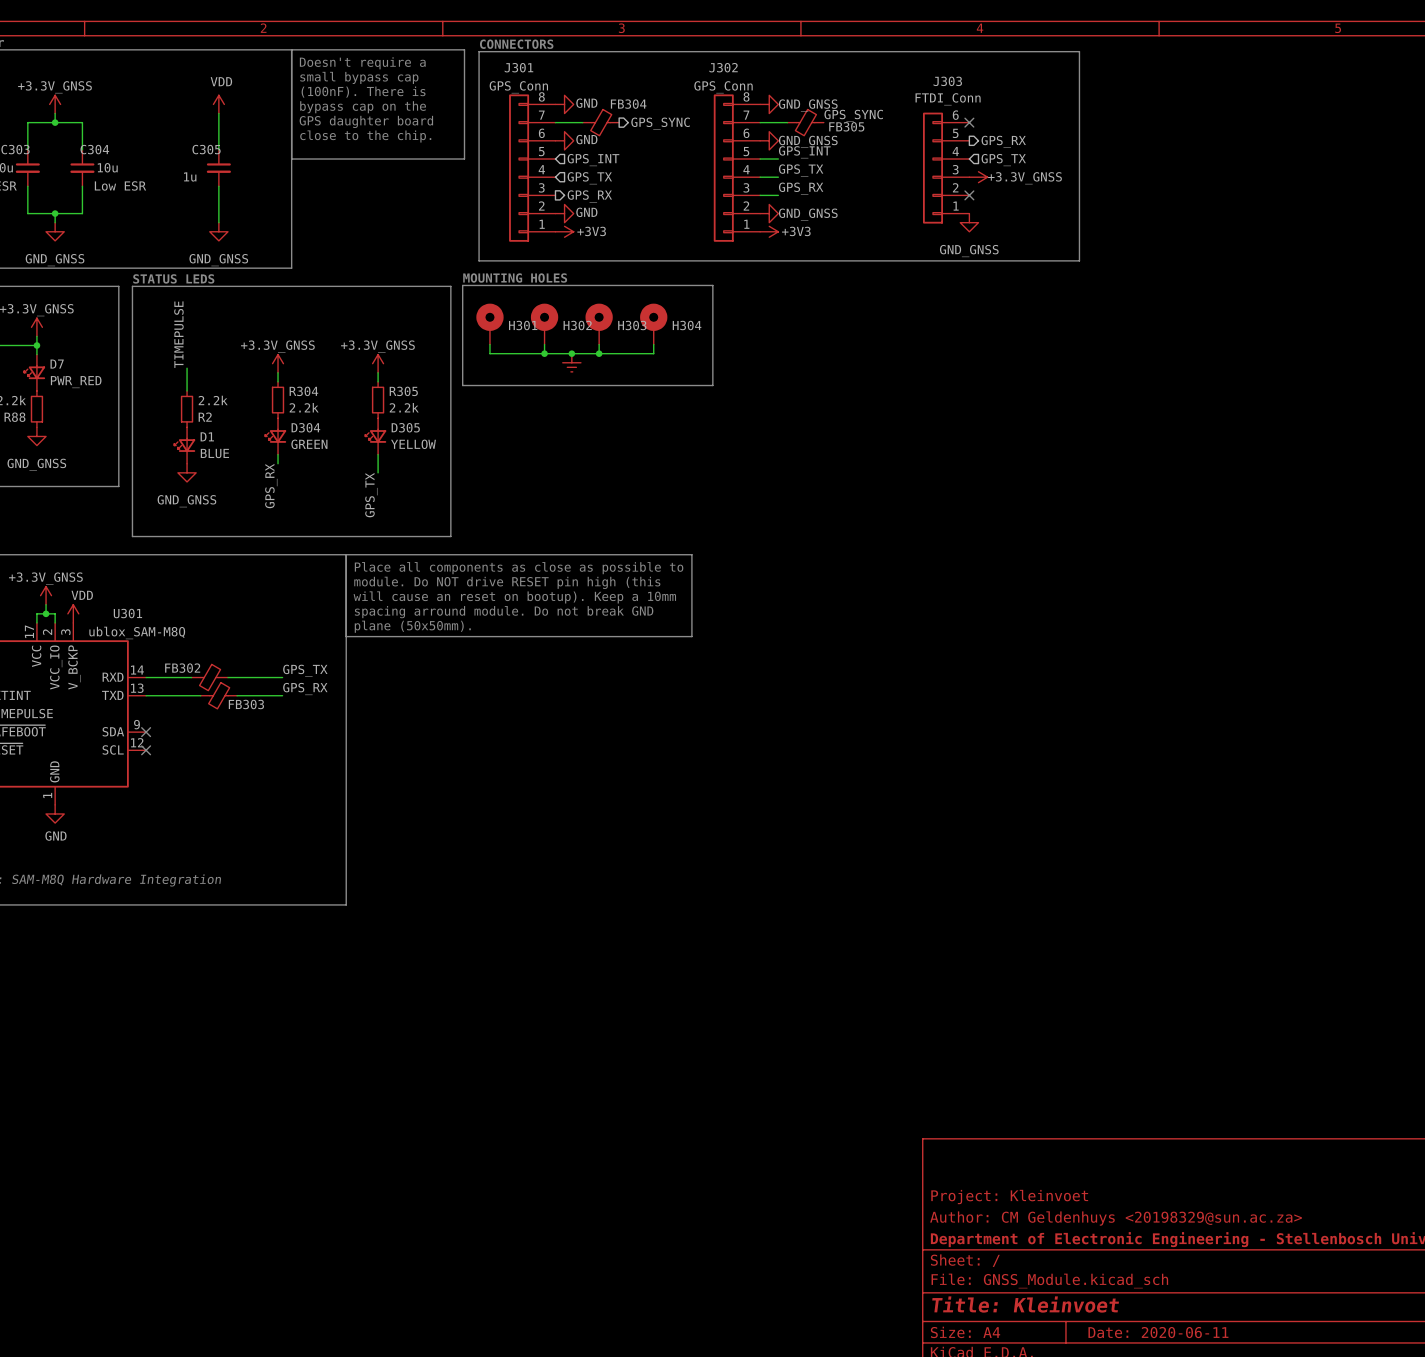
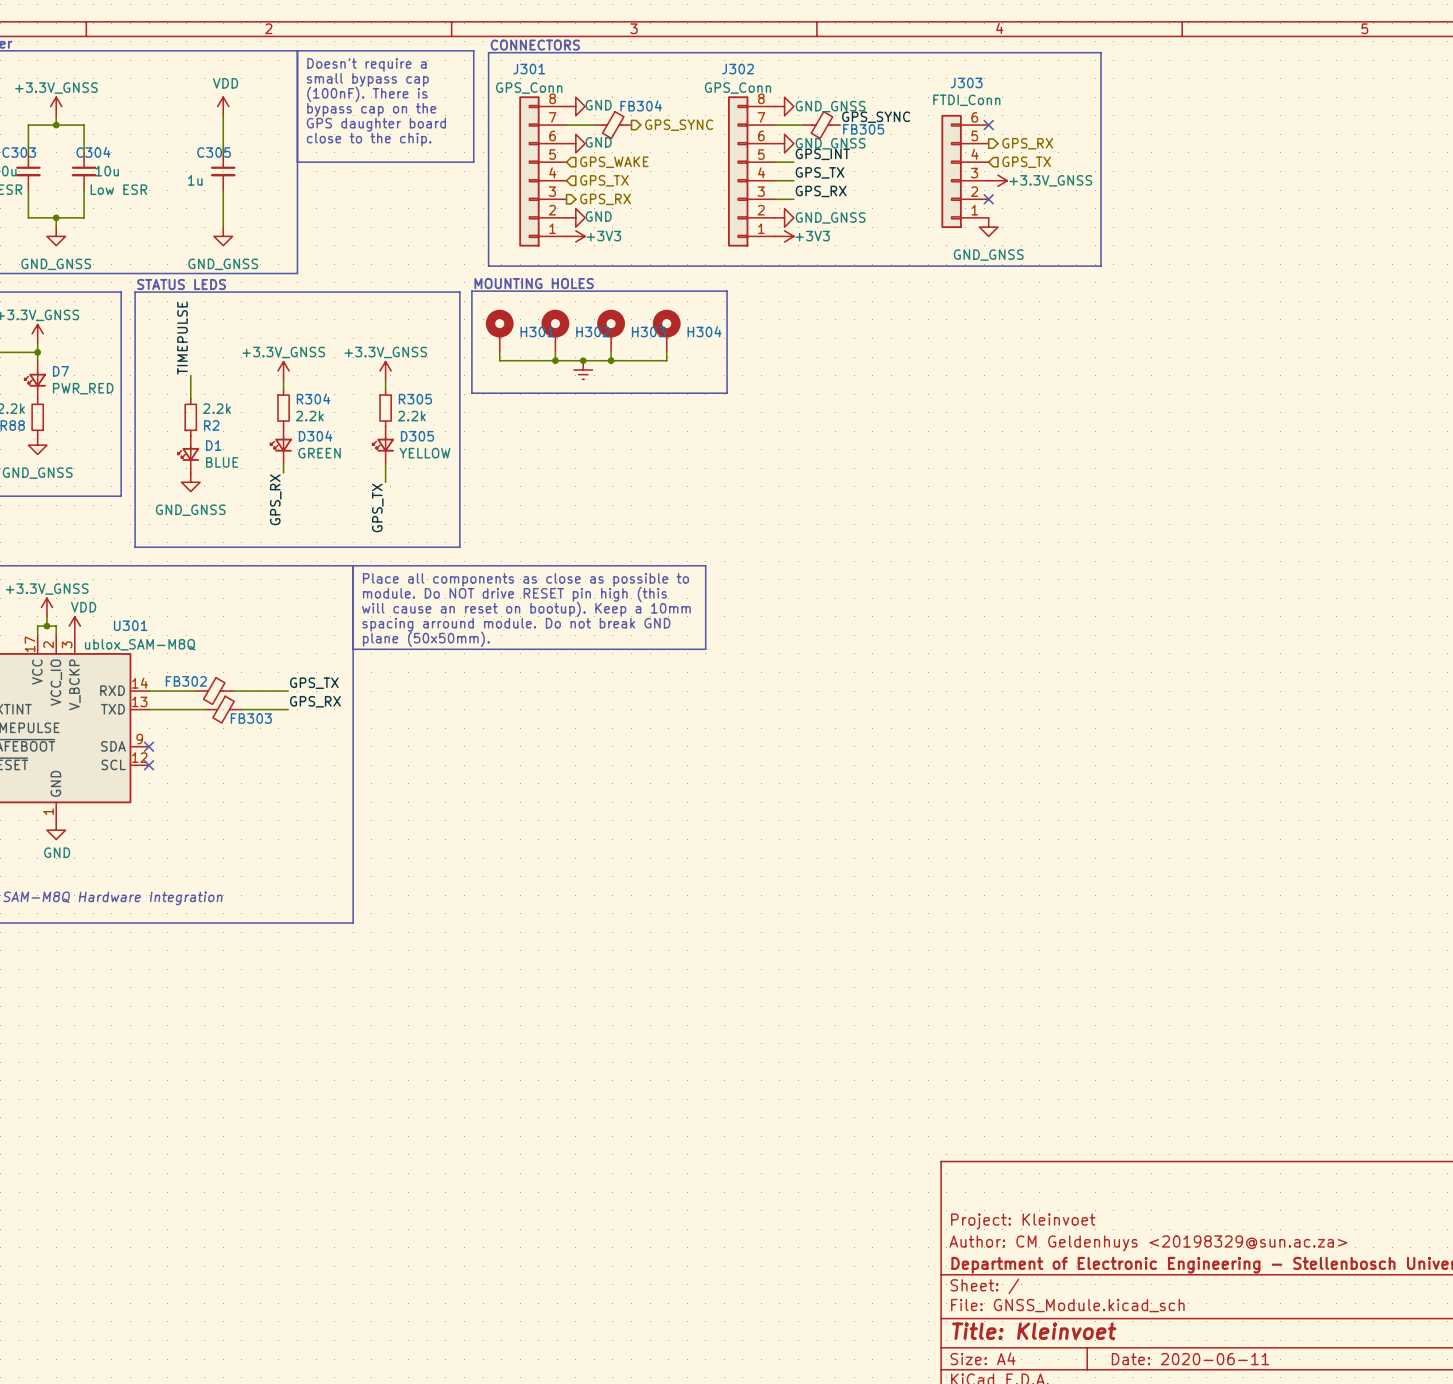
hierarchical label: GPS_INT (593, 160) -> GPS_WAKE (614, 162)

